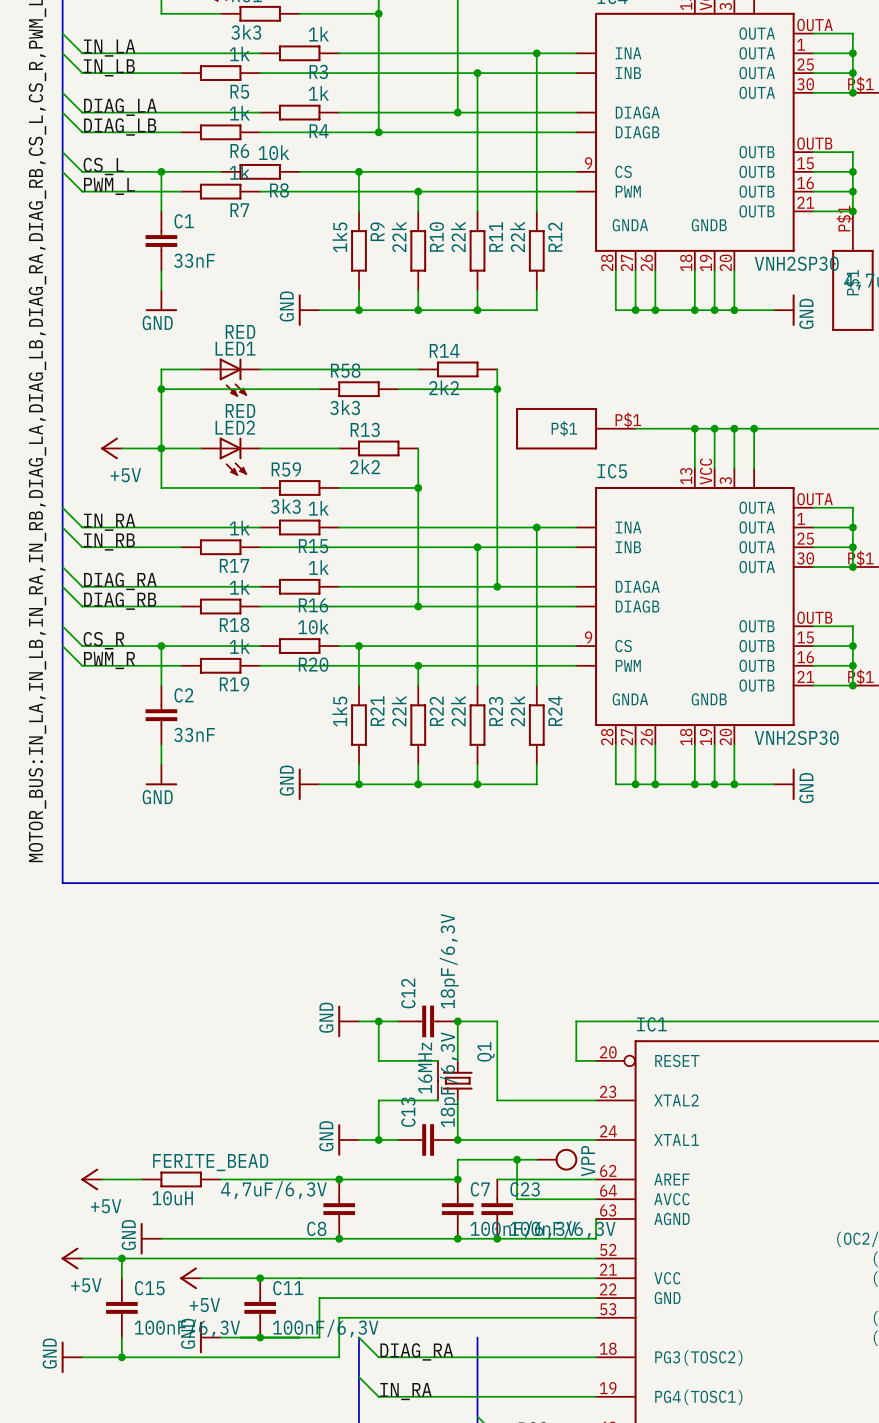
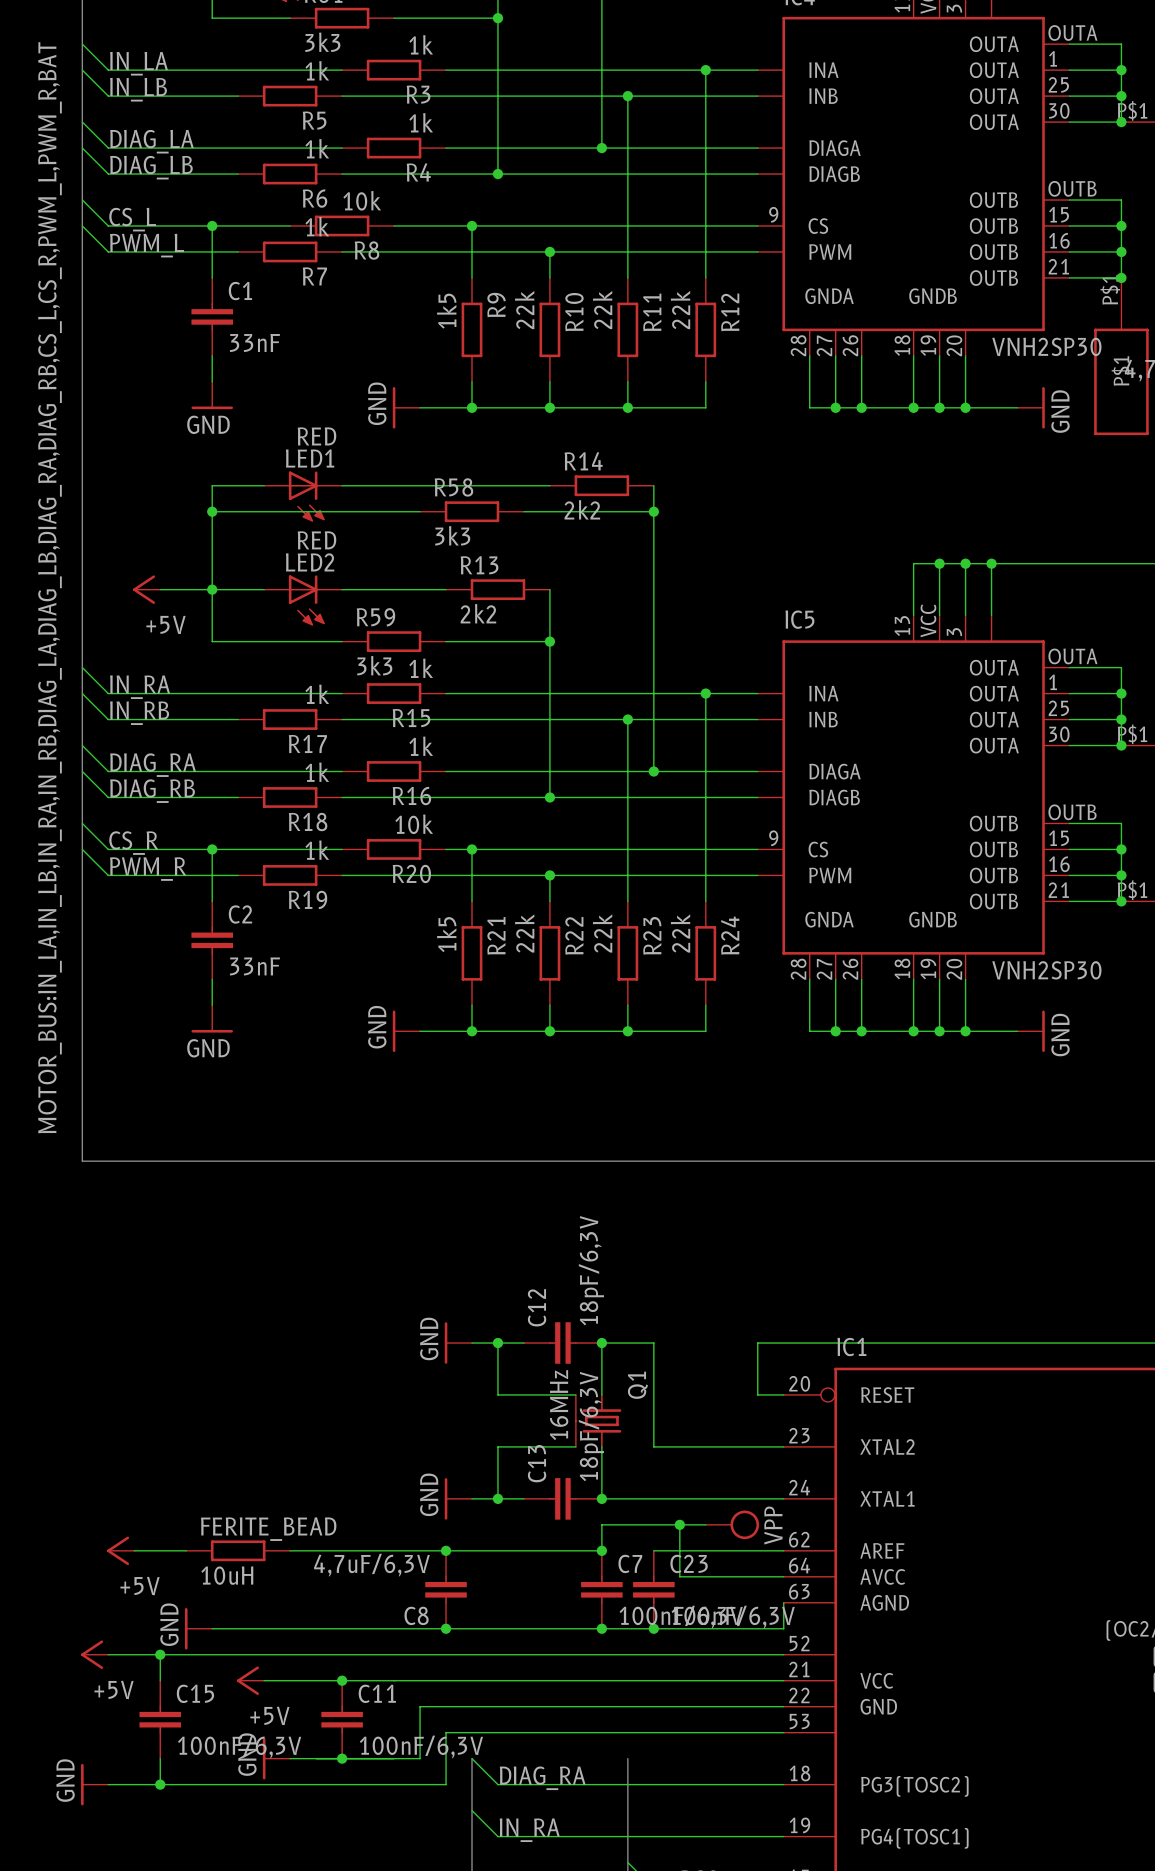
part: (575, 428) -> none
wire: (635, 428) (694, 428) -> none
junction: (694, 428) -> none

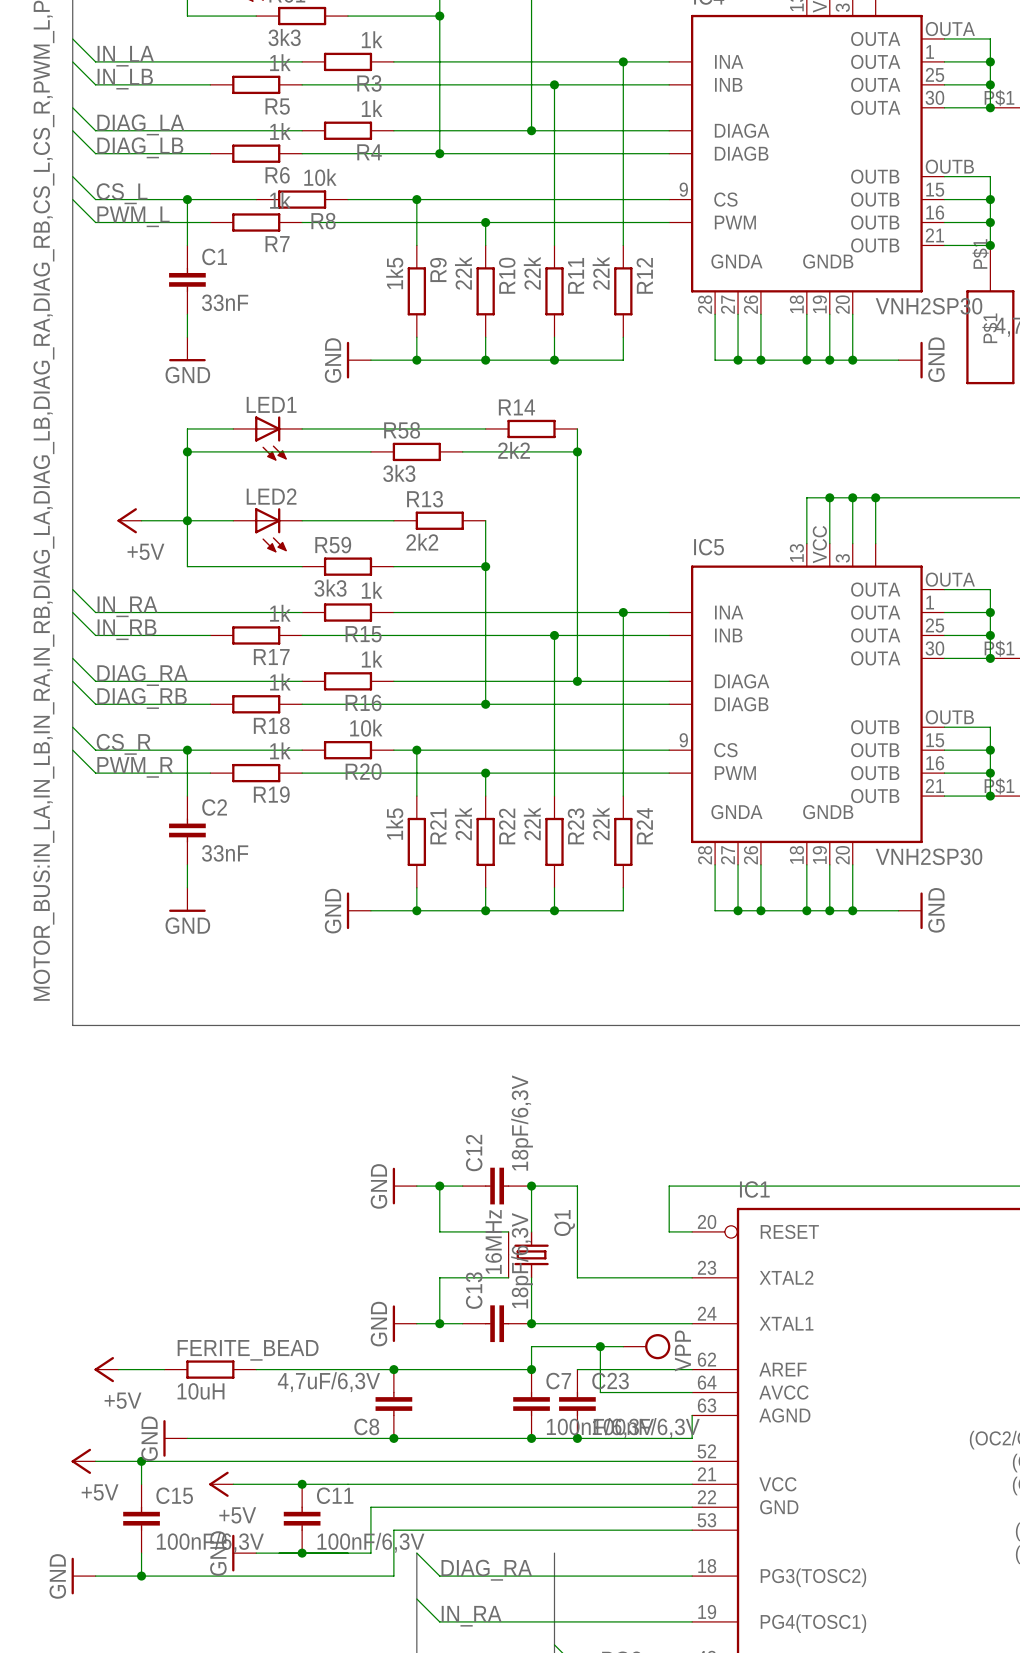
LED1 value: RED (316, 436) -> none
LED2 value: RED (316, 540) -> none

